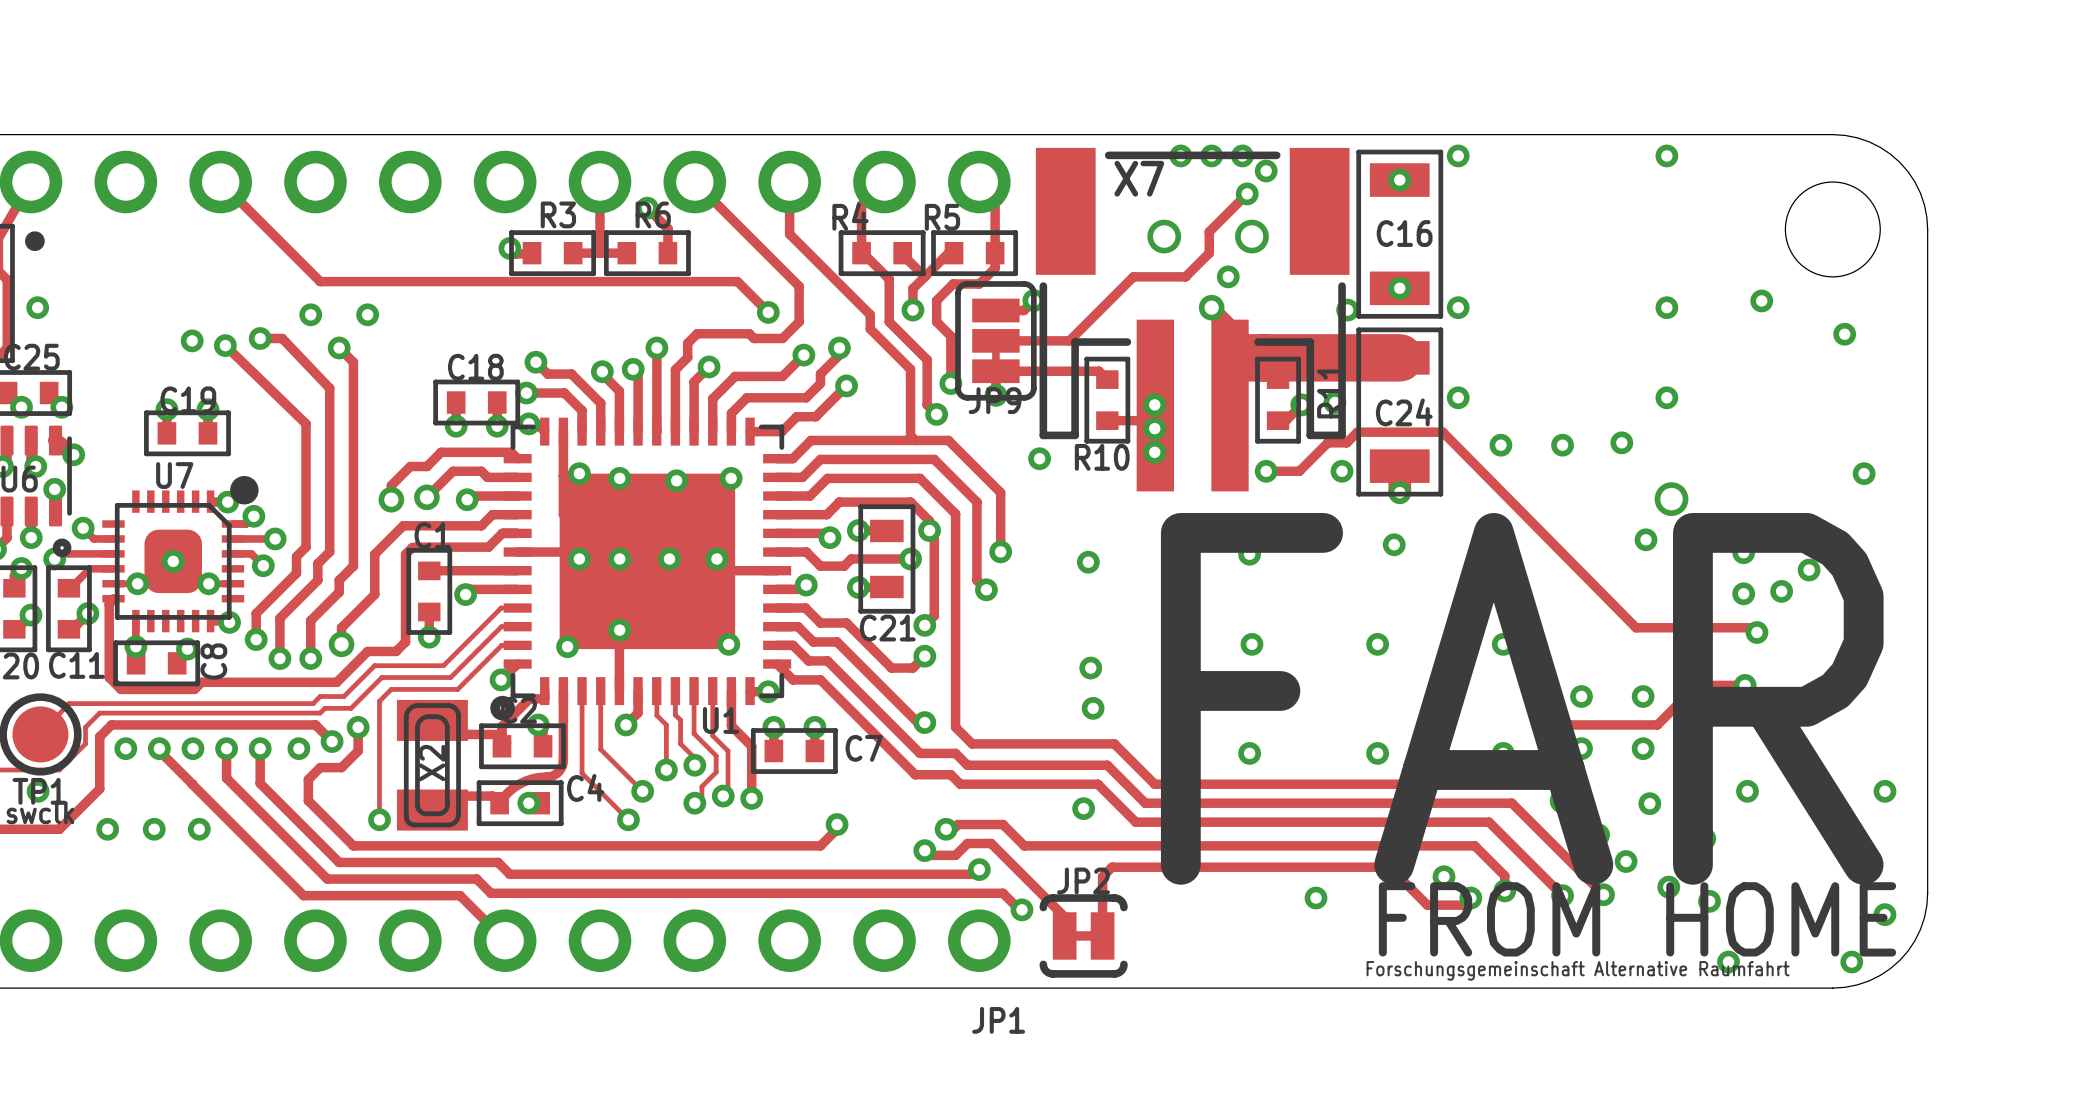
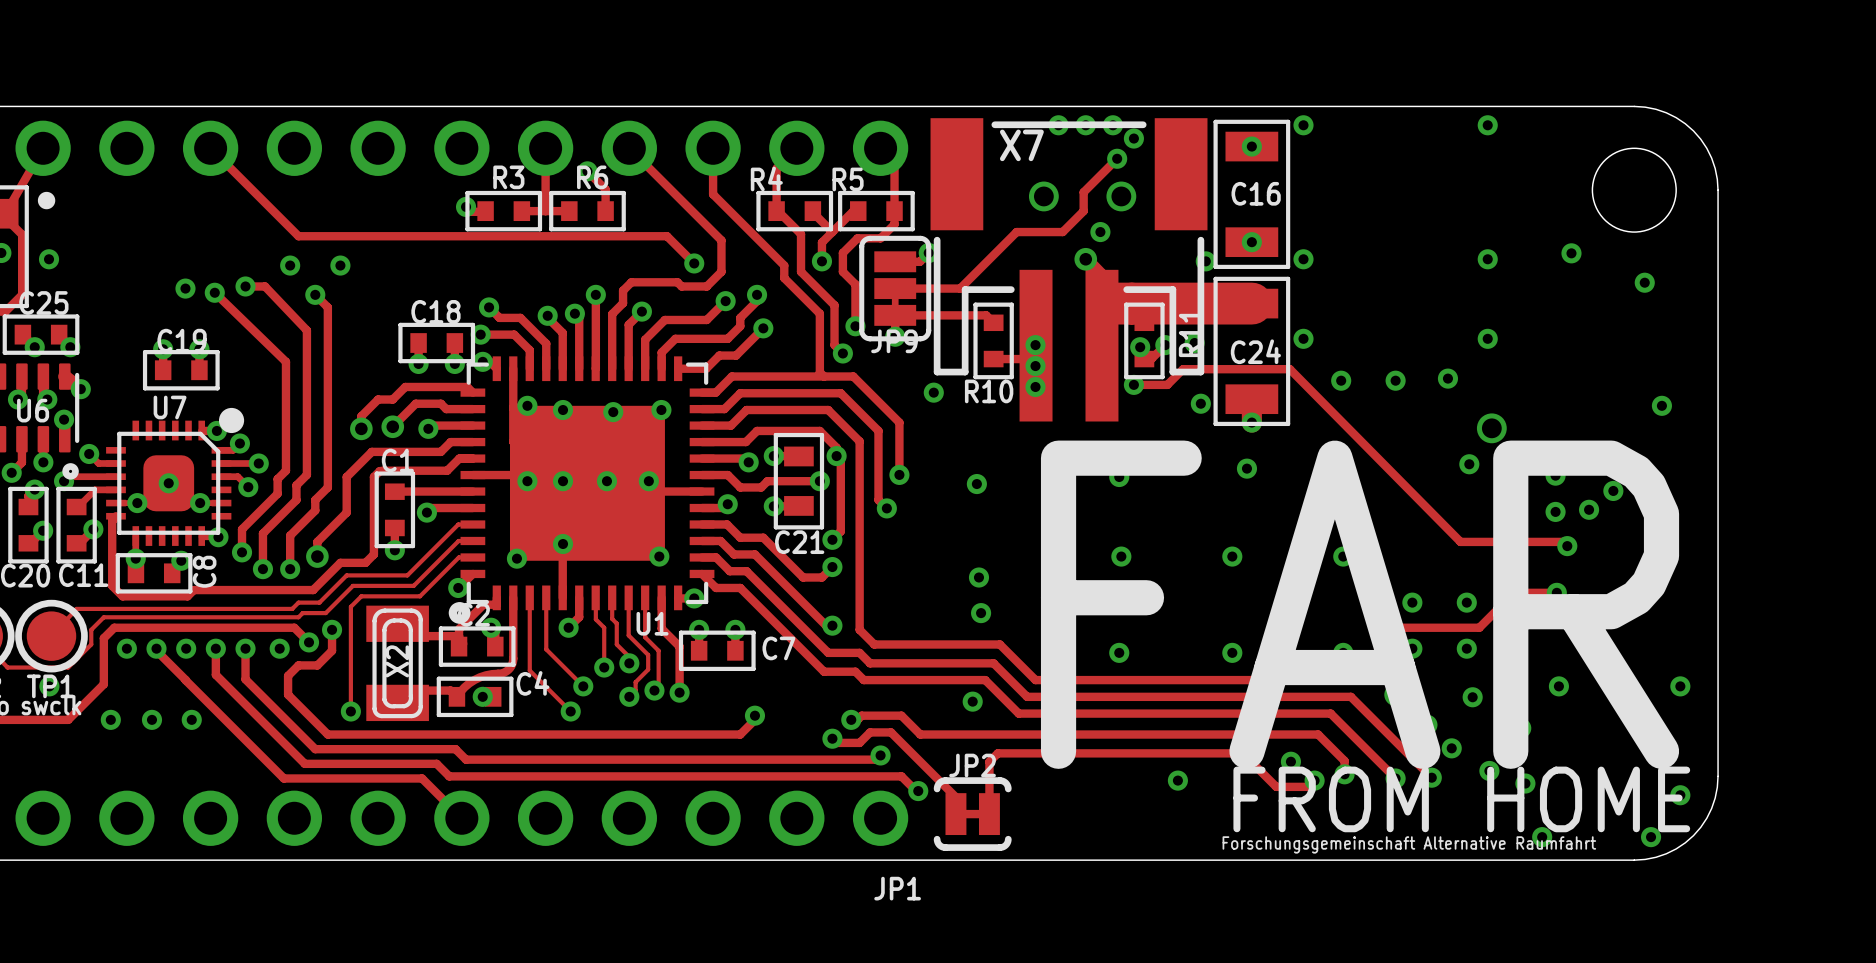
via: none -> (1140, 347)
track: (1357, 432) (1346, 442) (1327, 442) (1299, 471) (1266, 471) -> (1214, 369) (1183, 369) (1167, 384) (1133, 384)
via position: (1266, 471) -> (1133, 384)

